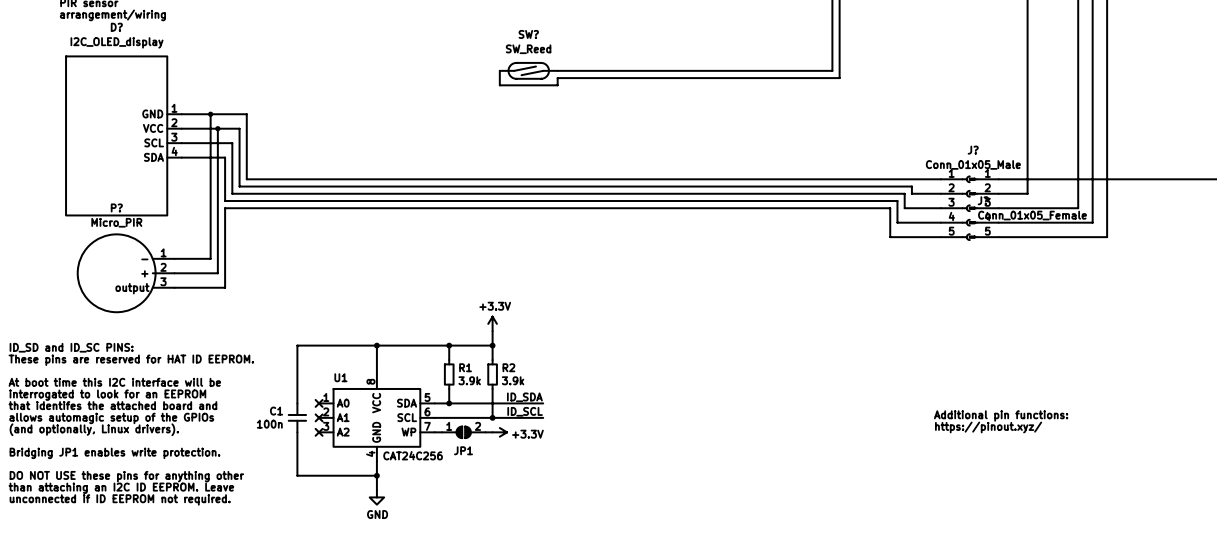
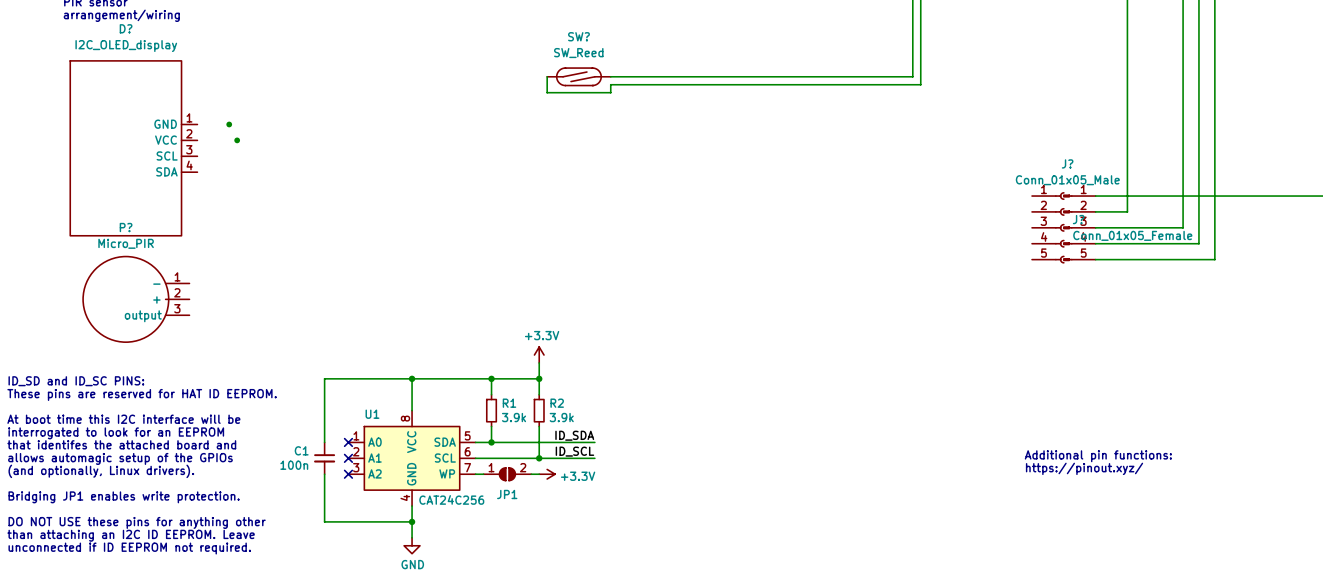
wire: (181, 114) (246, 114) (246, 179) (940, 179) -> none
wire: (210, 114) (210, 258) (174, 258) -> none
wire: (181, 128) (239, 128) (239, 186) (911, 186) (911, 193) (940, 193) -> none
wire: (217, 128) (217, 273) (174, 273) -> none
wire: (181, 143) (232, 143) (232, 193) (904, 193) (904, 208) (940, 208) -> none
wire: (181, 157) (225, 157) (225, 201) (897, 201) (897, 222) (940, 222) -> none
wire: (940, 237) (890, 237) (890, 208) (225, 208) (225, 287) (174, 287) -> none

